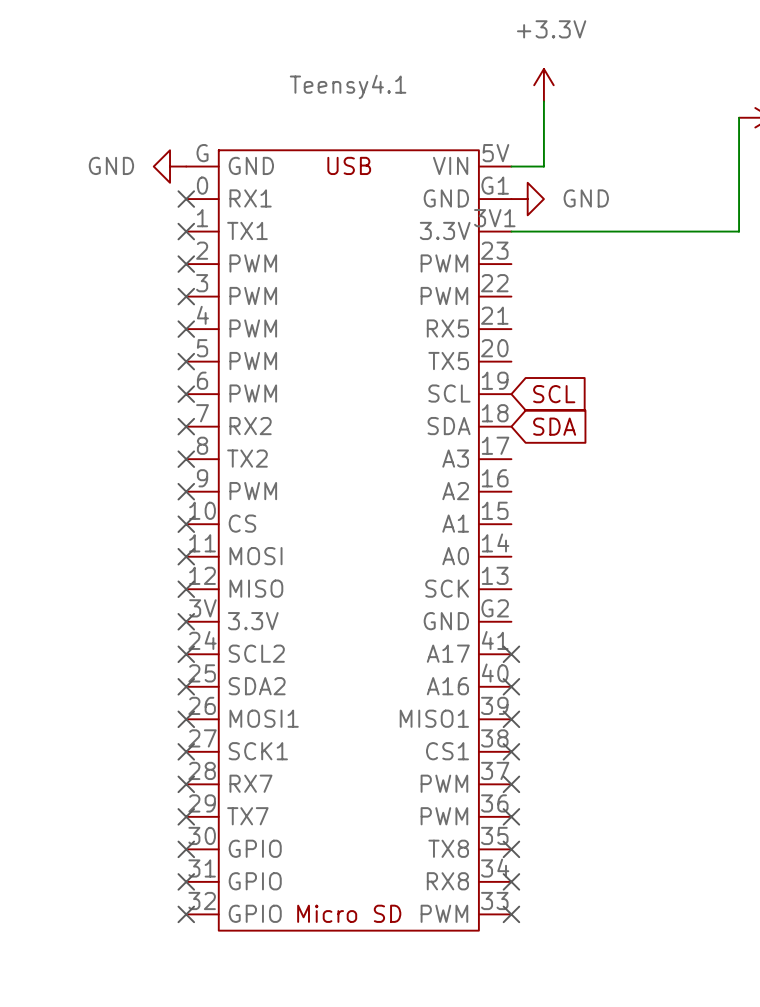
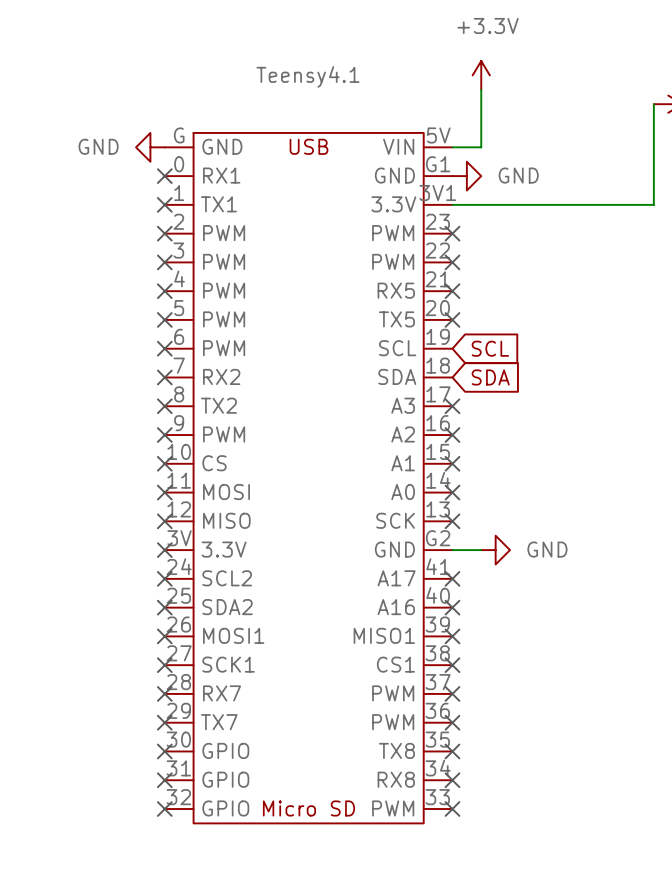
no-connect mark: none -> (452, 233)
no-connect mark: none -> (452, 262)
no-connect mark: none -> (452, 291)
no-connect mark: none -> (452, 319)
no-connect mark: none -> (452, 406)
no-connect mark: none -> (452, 435)
no-connect mark: none -> (452, 463)
no-connect mark: none -> (452, 492)
no-connect mark: none -> (452, 521)
wire: none -> (452, 550) (481, 550)
power symbol: none -> GND (495, 550)

